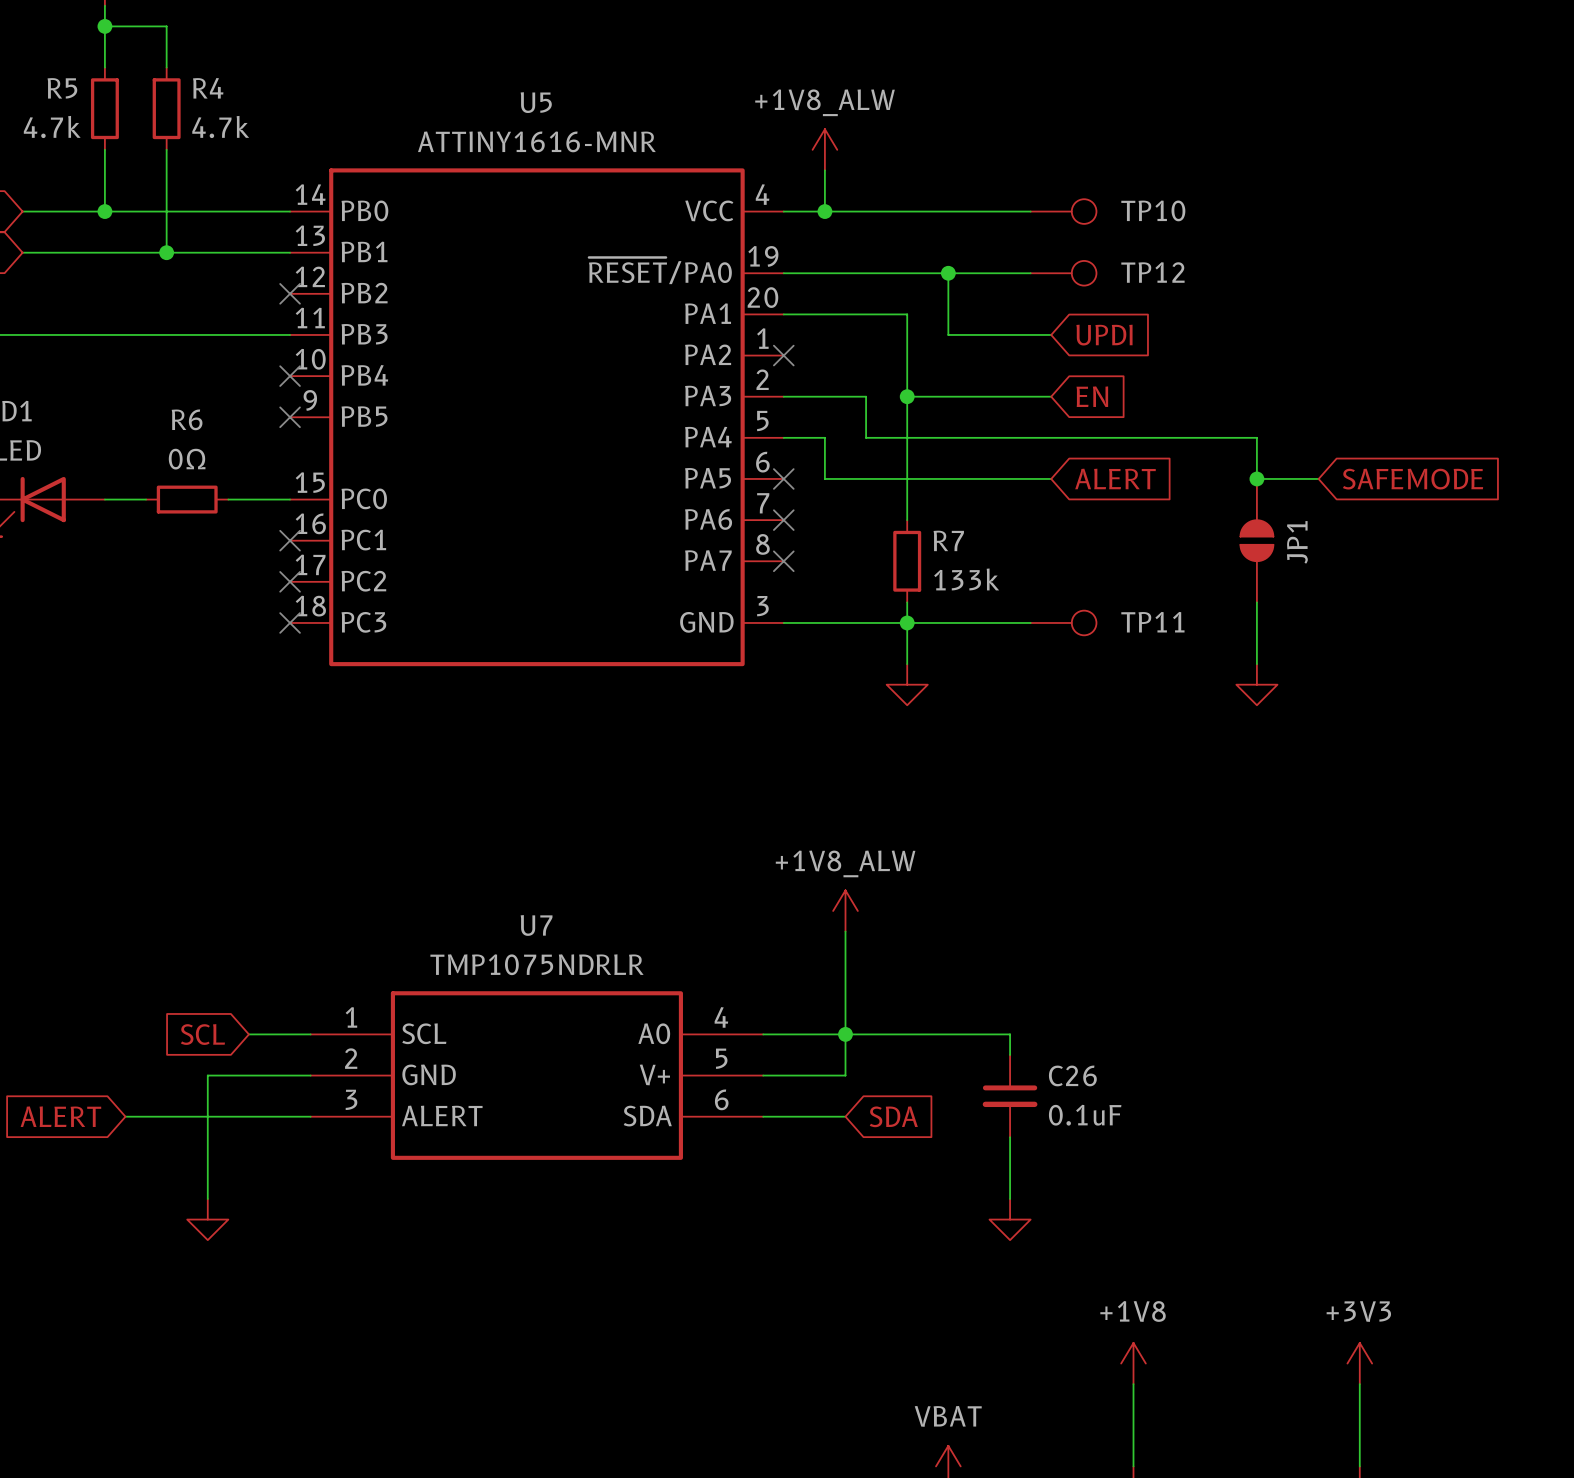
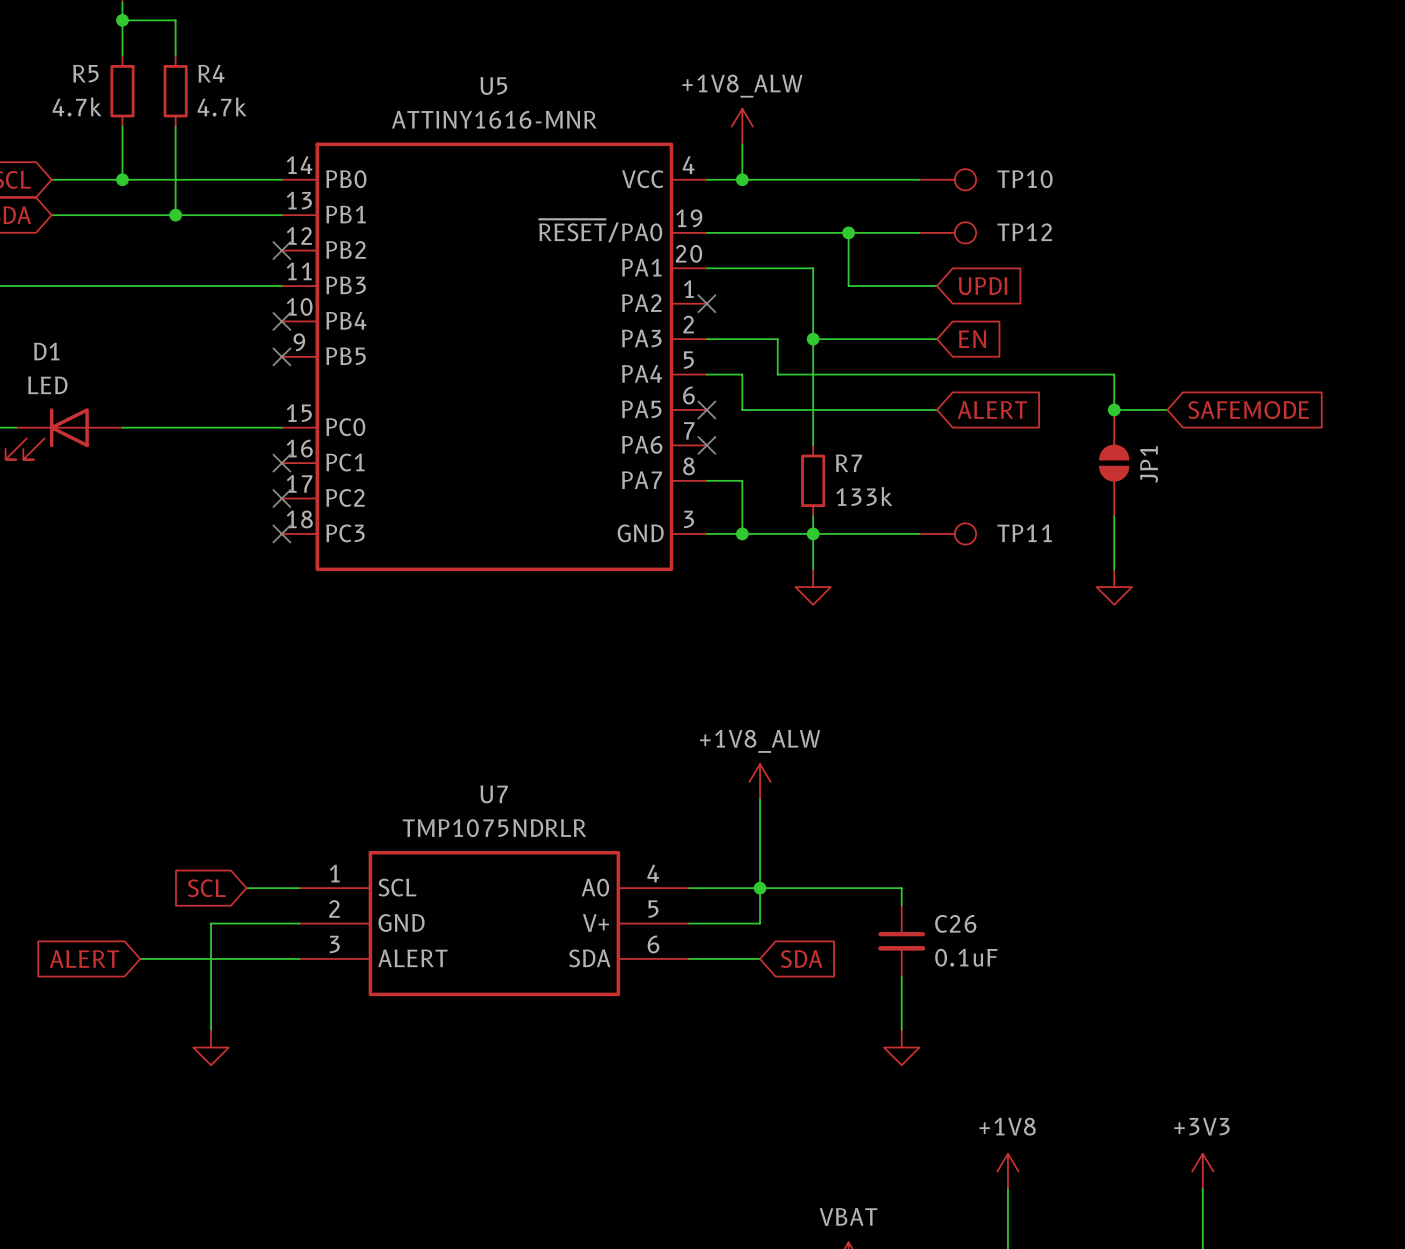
wire: none -> (157, 427) (228, 427)
R6: 0Ω (187, 499) -> none
wire: none -> (706, 480) (742, 480) (742, 533)
no-connect mark: (783, 561) -> none
junction: none -> (742, 533)

